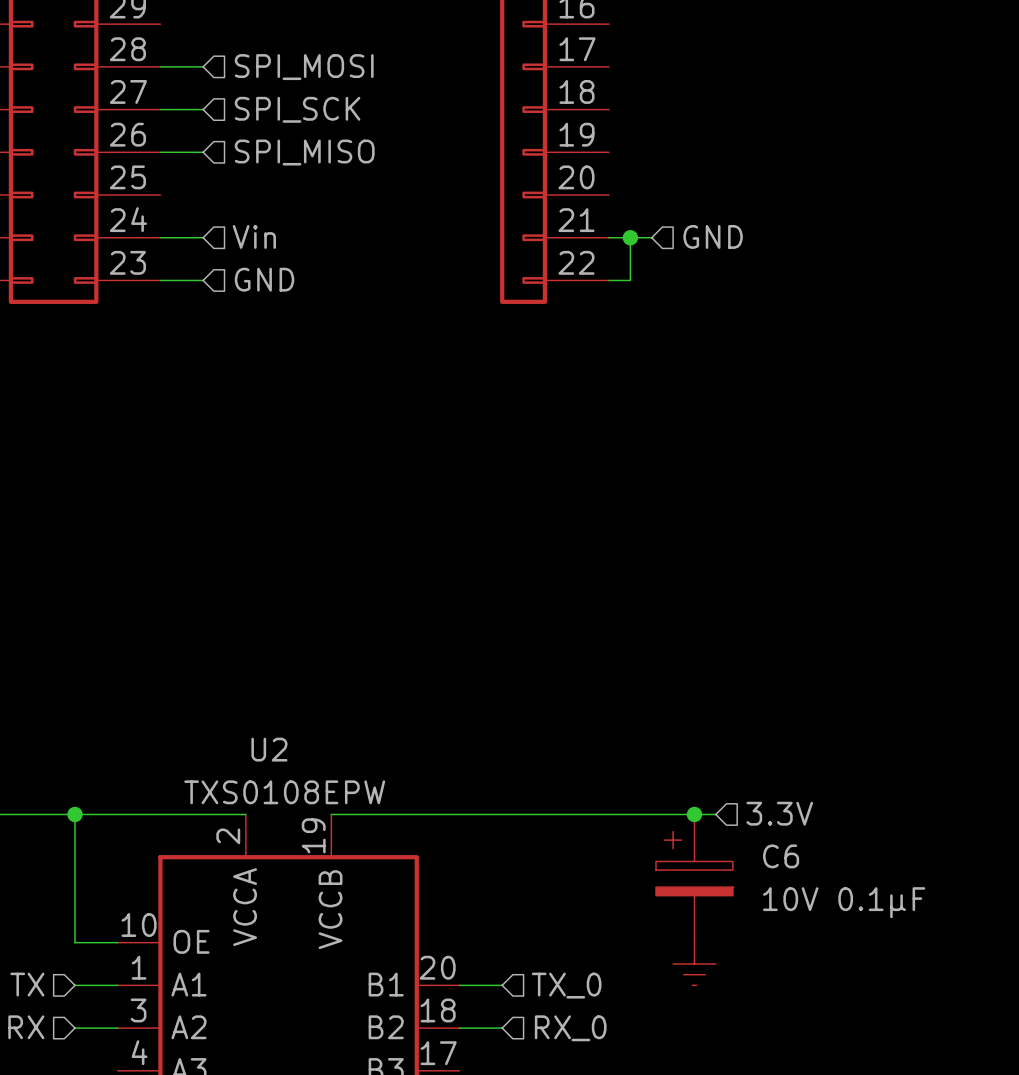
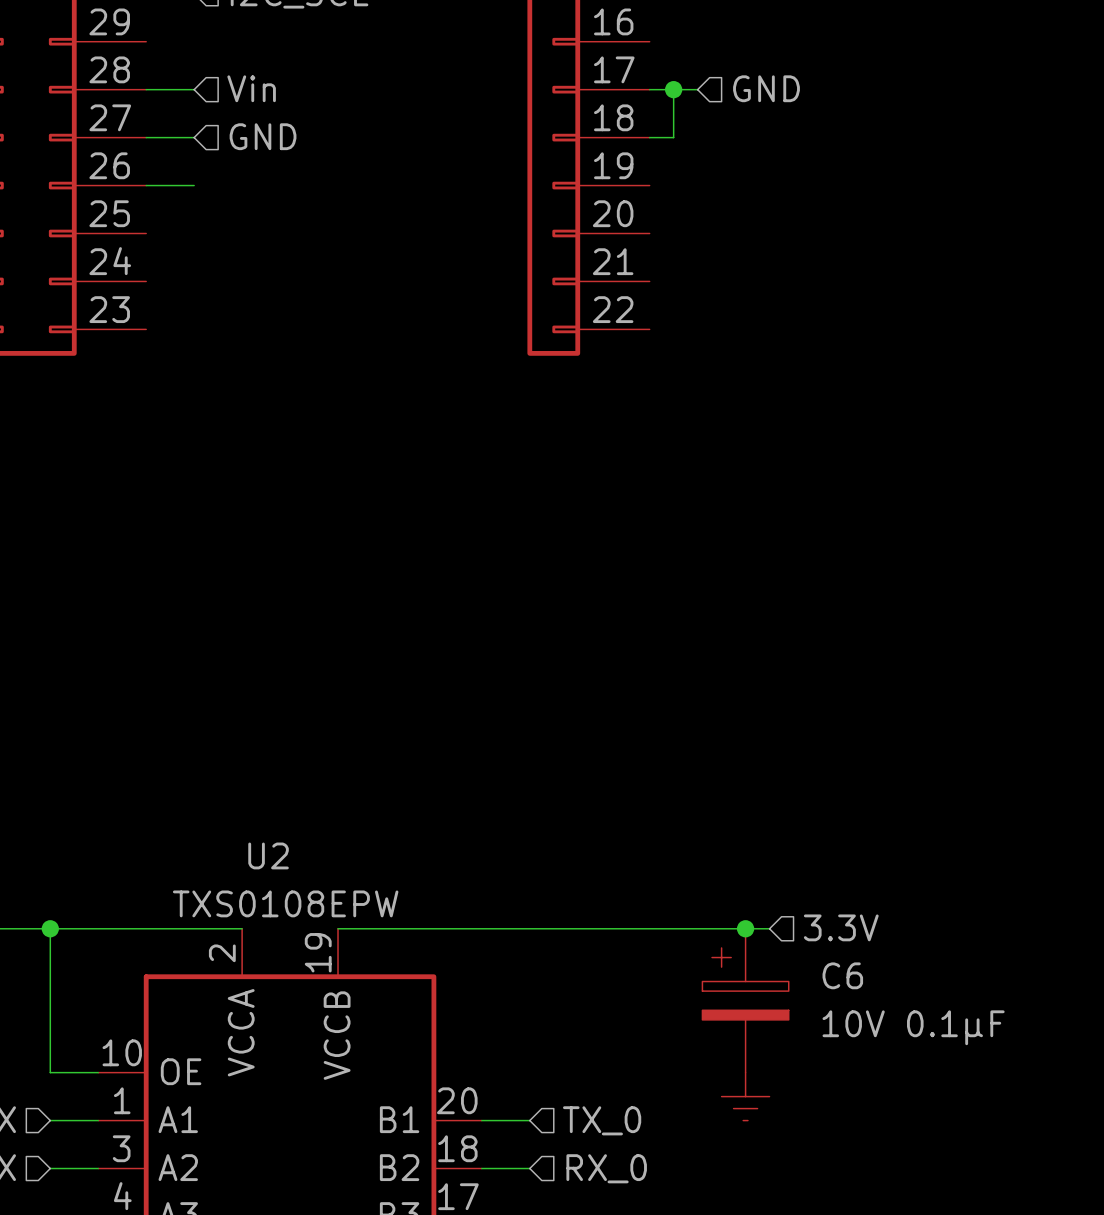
junction: none -> (673, 89)
hierarchical label: SPI_MOSI (304, 67) -> Vin (251, 88)
hierarchical label: SPI_SCK (297, 109) -> GND (263, 136)
hierarchical label: SPI_MISO (304, 152) -> none
hierarchical label: Vin (254, 236) -> none
hierarchical label position: GND (713, 236) -> GND (766, 88)
wire: (160, 237) (203, 237) -> none
wire: (609, 237) (651, 237) -> (649, 89) (697, 89)
wire: (630, 237) (630, 280) (609, 280) -> (673, 89) (673, 137) (649, 137)
junction: (630, 237) -> none
hierarchical label: GND (264, 279) -> none
wire: (160, 280) (203, 280) -> none

